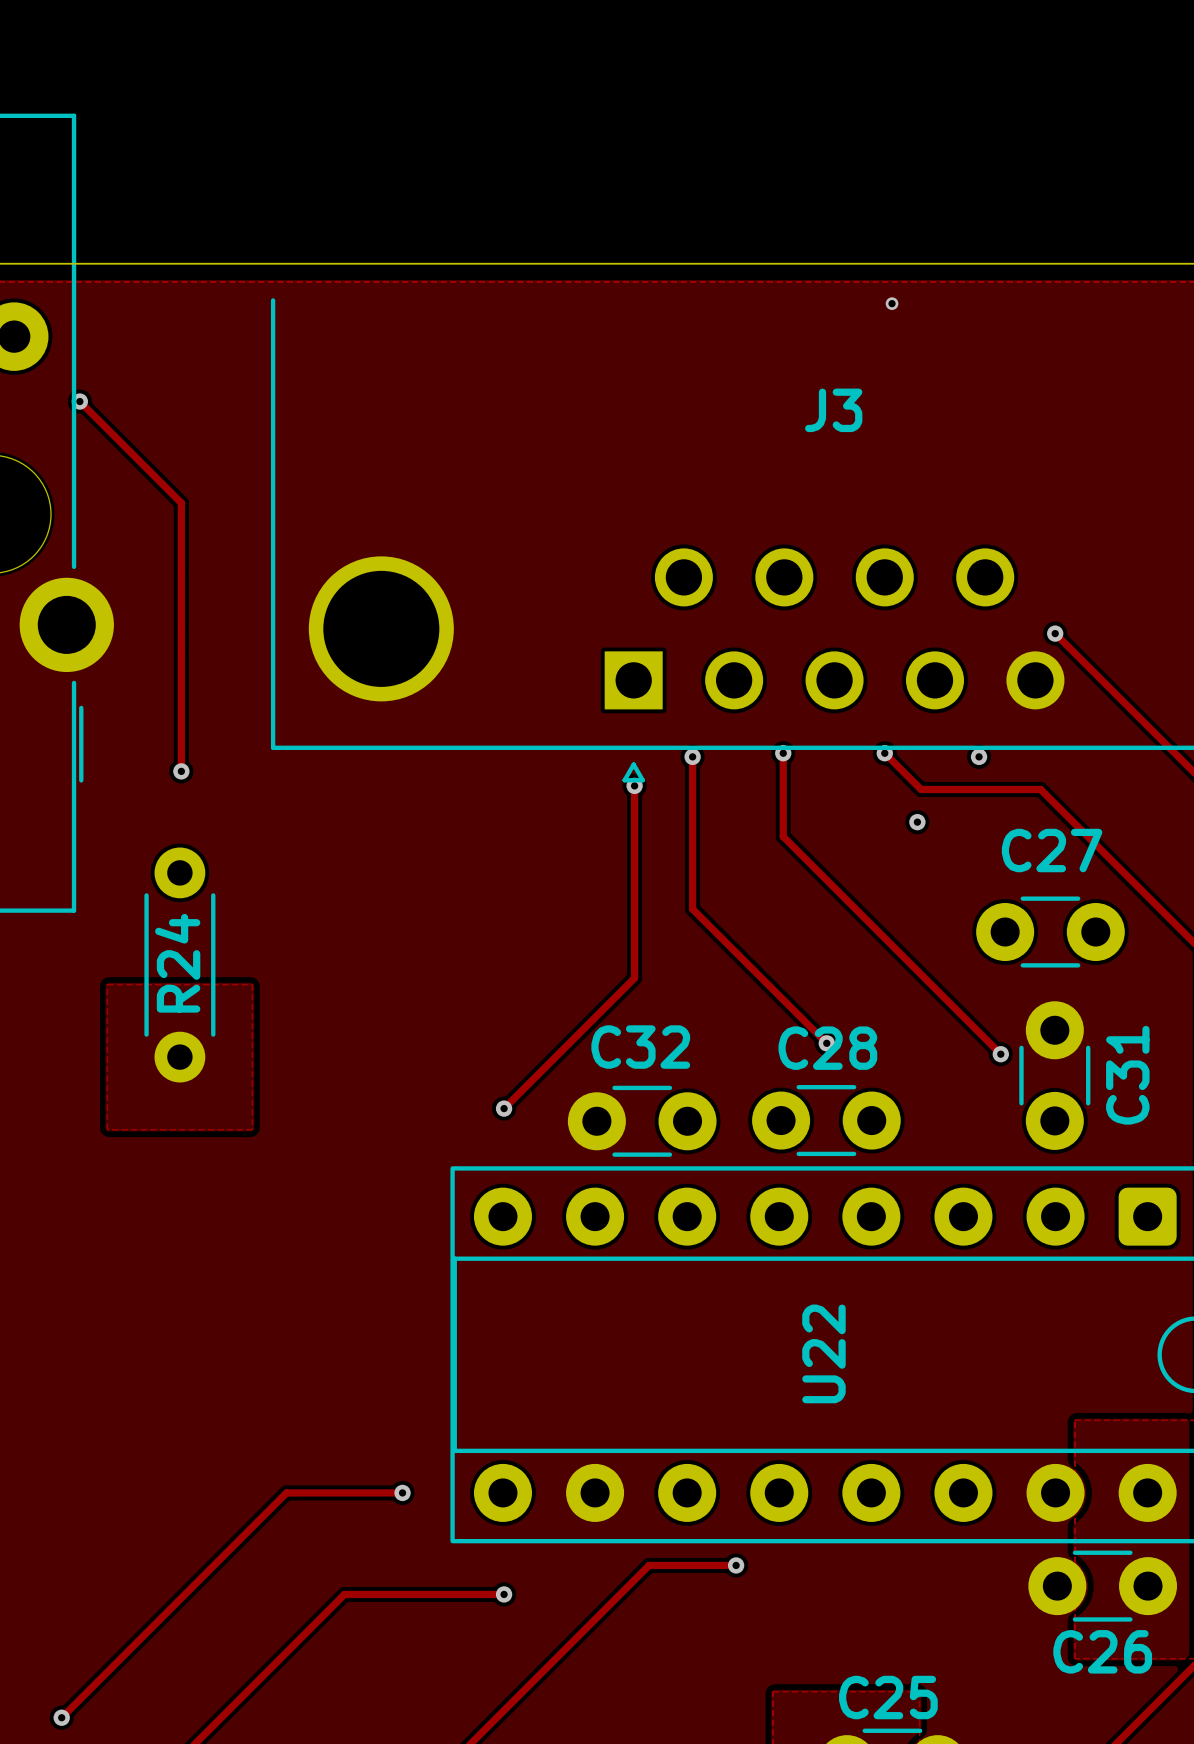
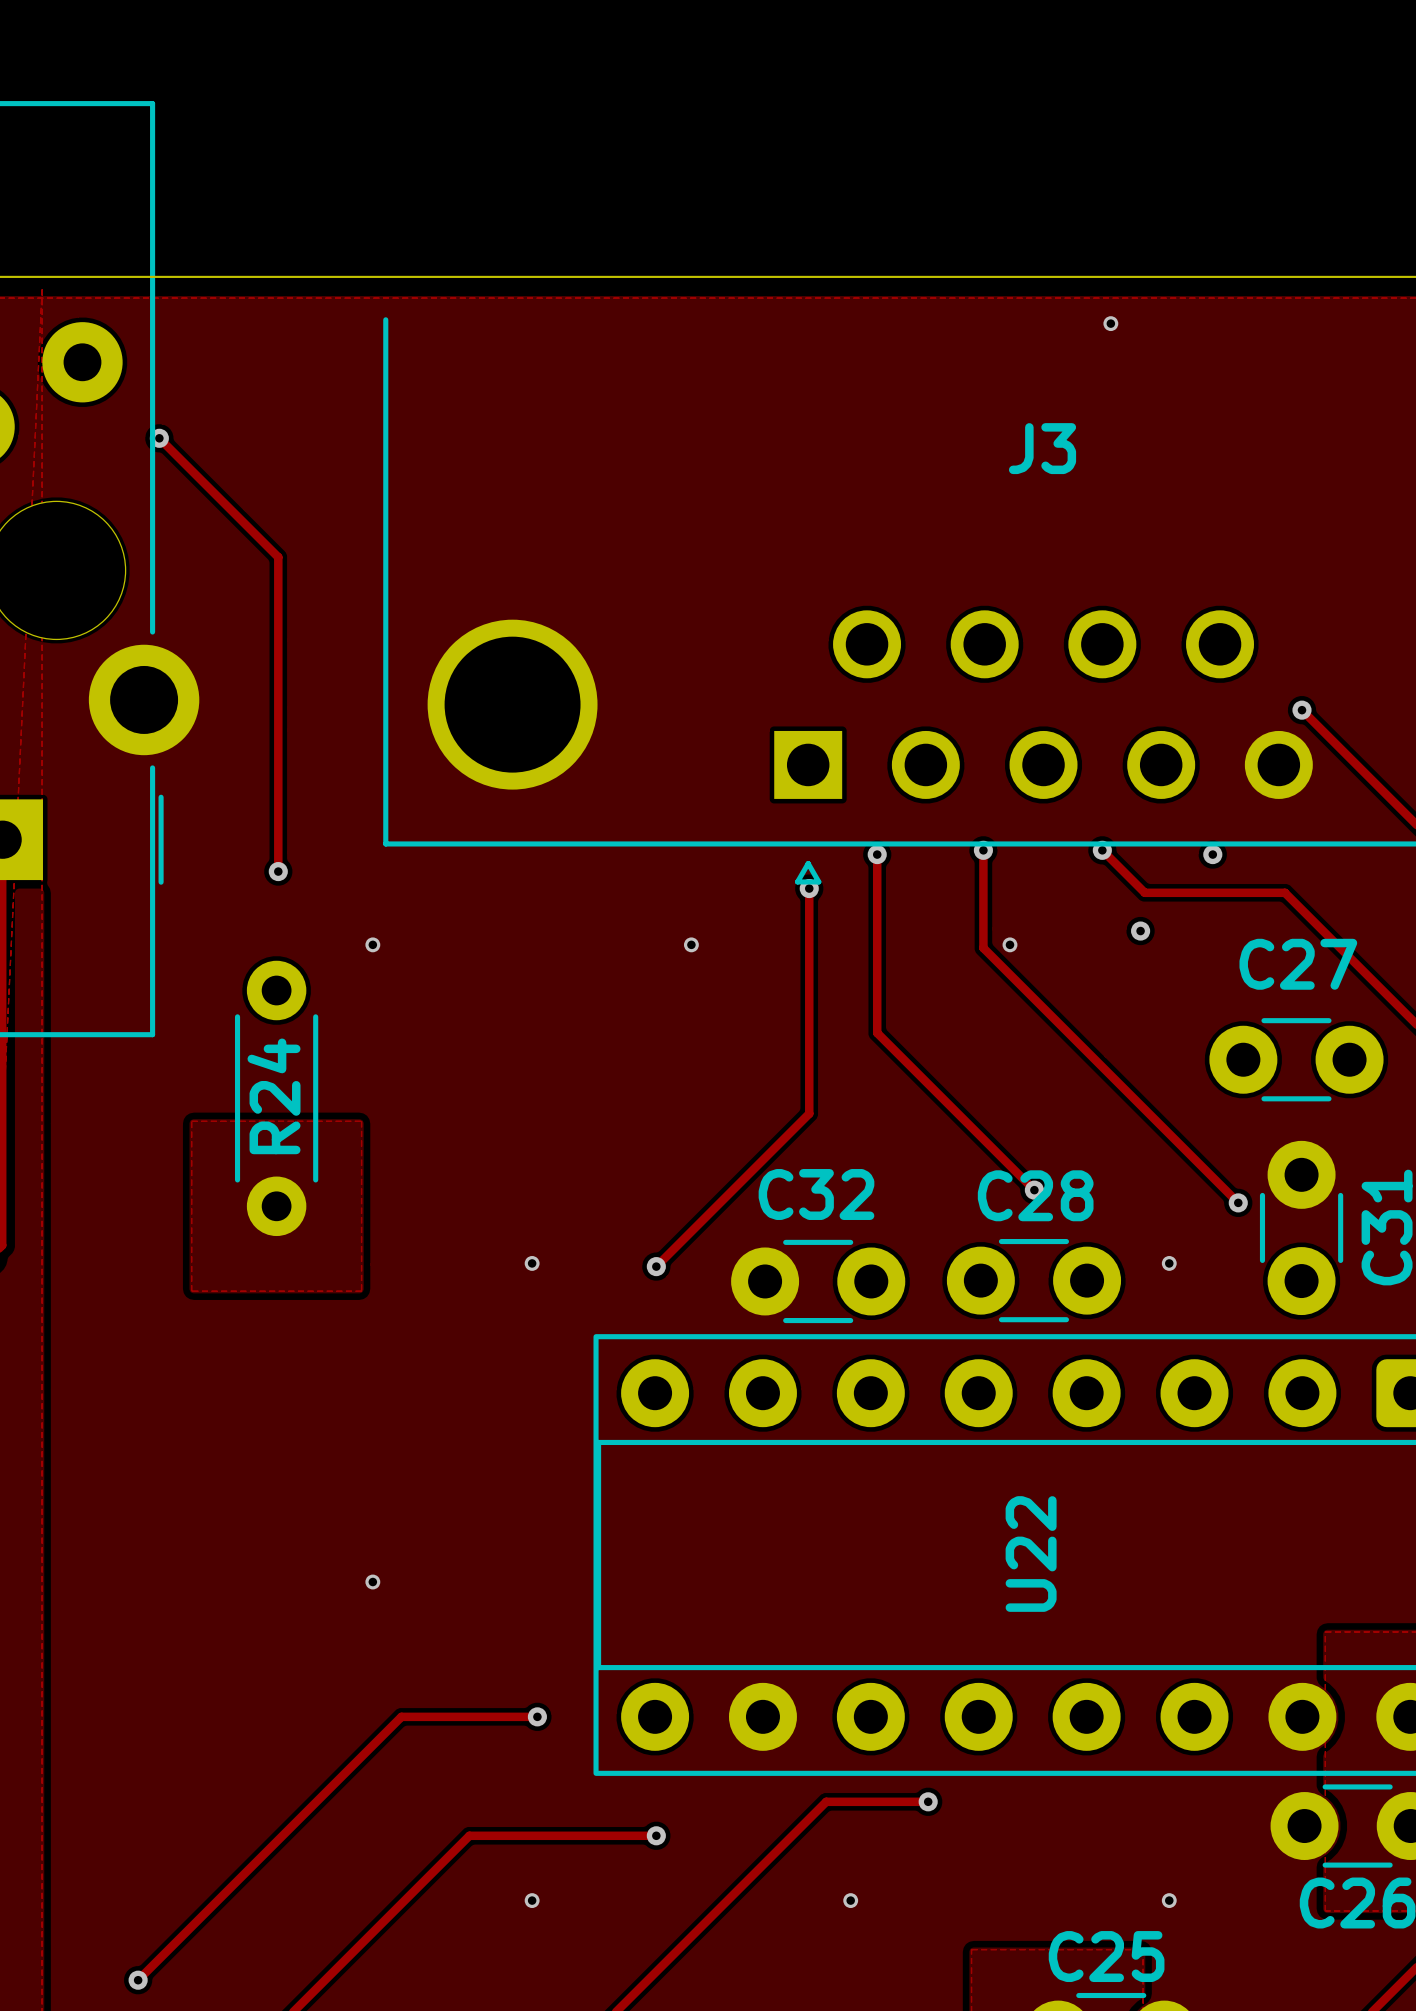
via: none -> (372, 944)
via: none -> (691, 944)
via: none -> (1009, 944)
via: none -> (532, 1263)
via: none -> (1169, 1263)
via: none -> (372, 1582)
via: none -> (532, 1900)
via: none -> (850, 1900)
via: none -> (1169, 1900)

